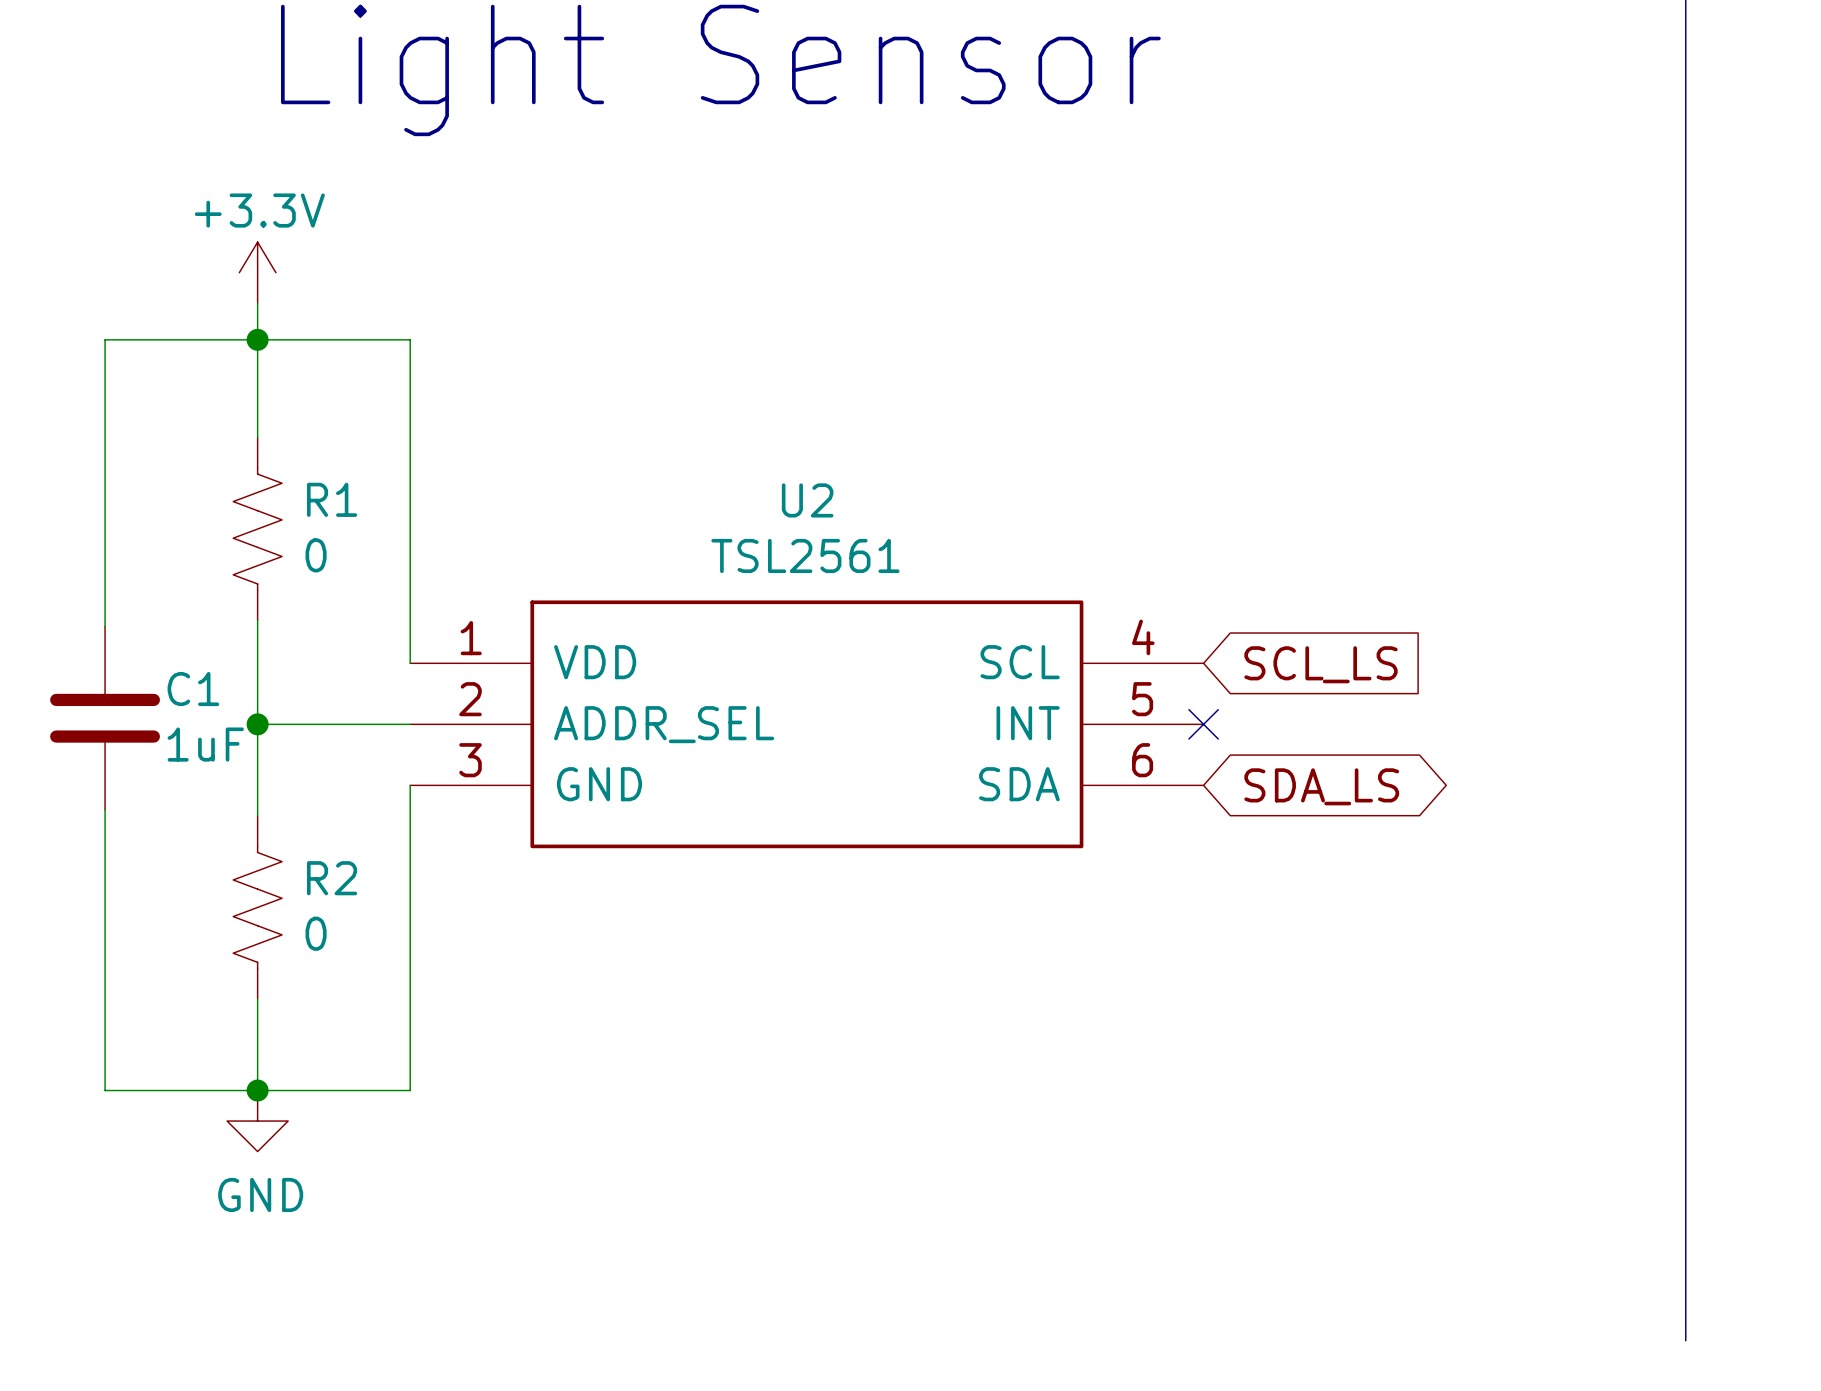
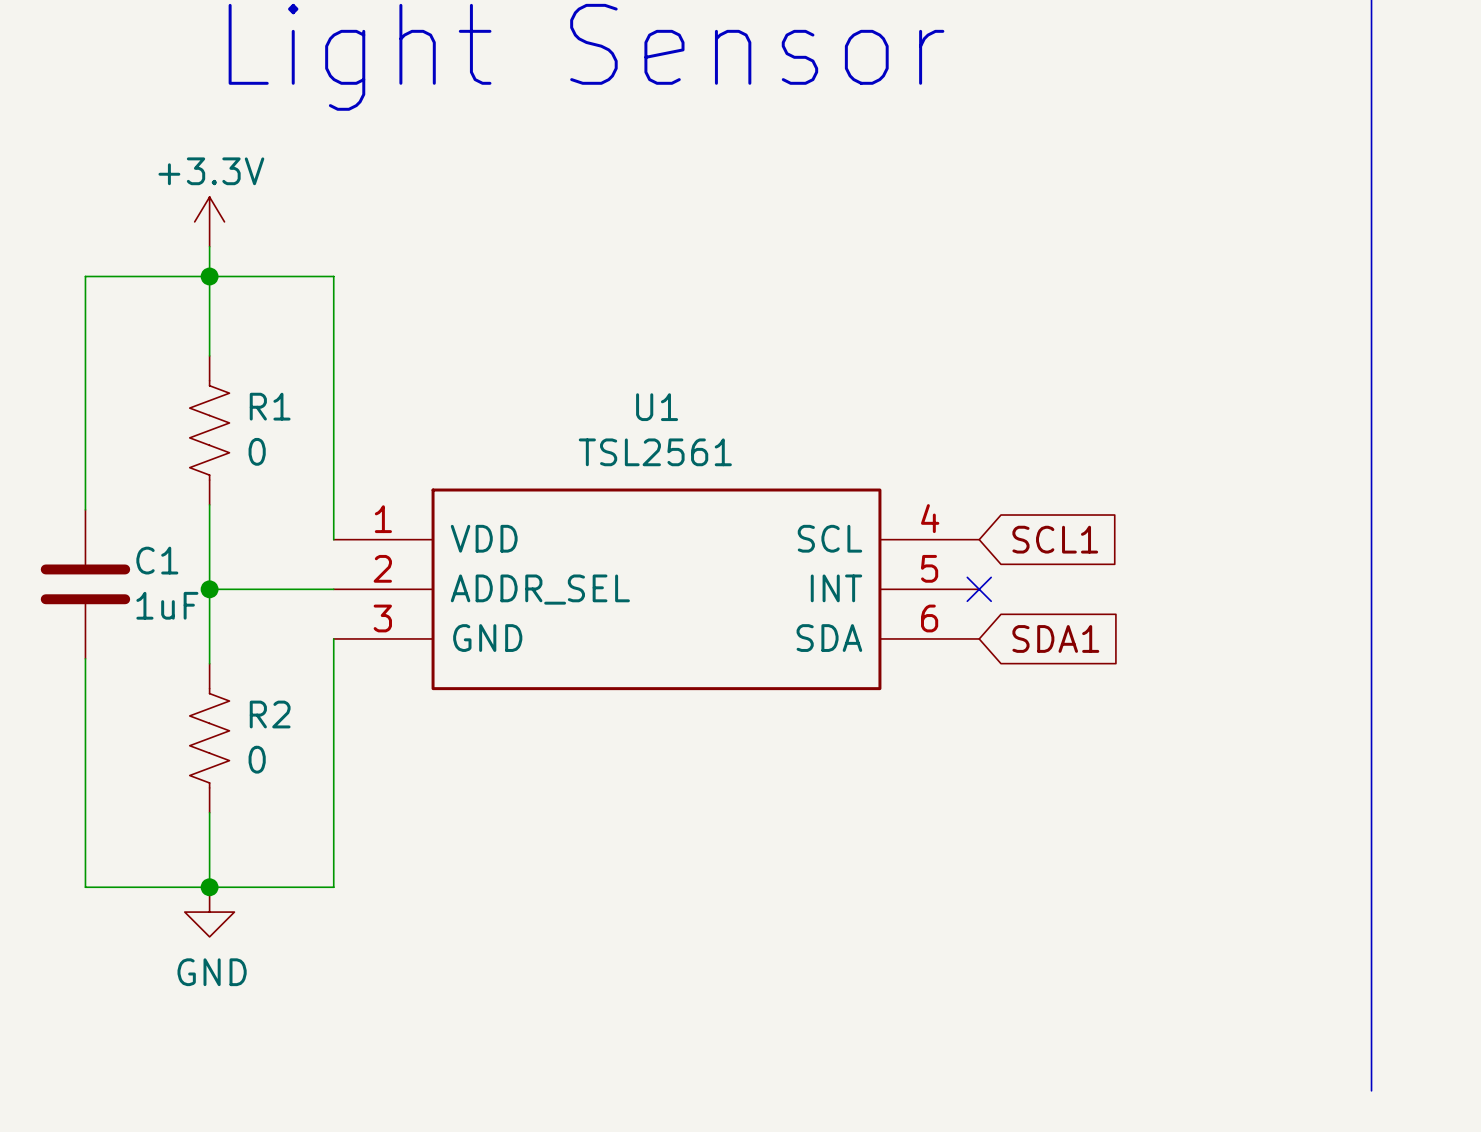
U2 name: U2 (807, 500) -> U1 (657, 407)
global label: SCL_LS (1321, 664) -> SCL1 (1055, 539)
global label shape: bidirectional (1321, 786) -> input (1055, 638)
global label: SDA_LS (1321, 786) -> SDA1 (1055, 638)

